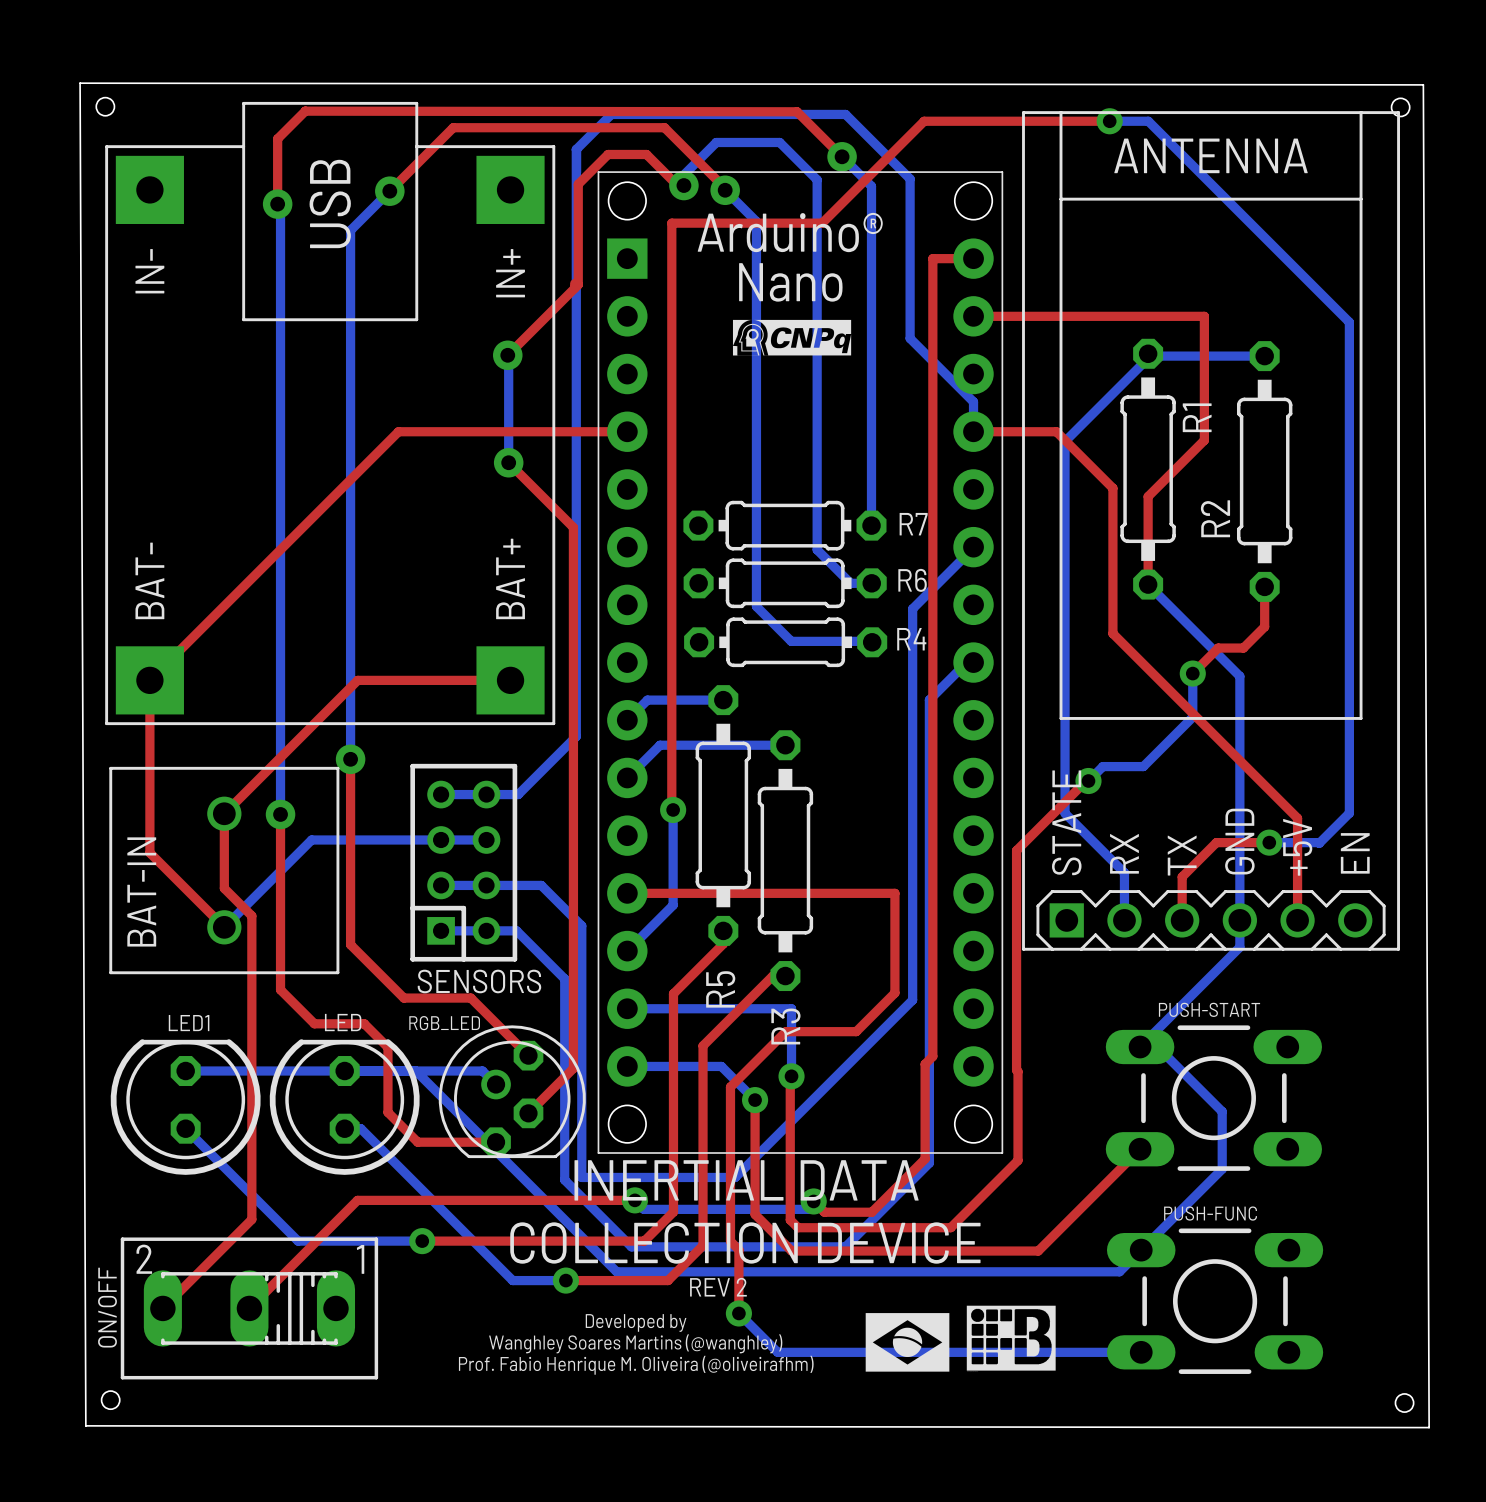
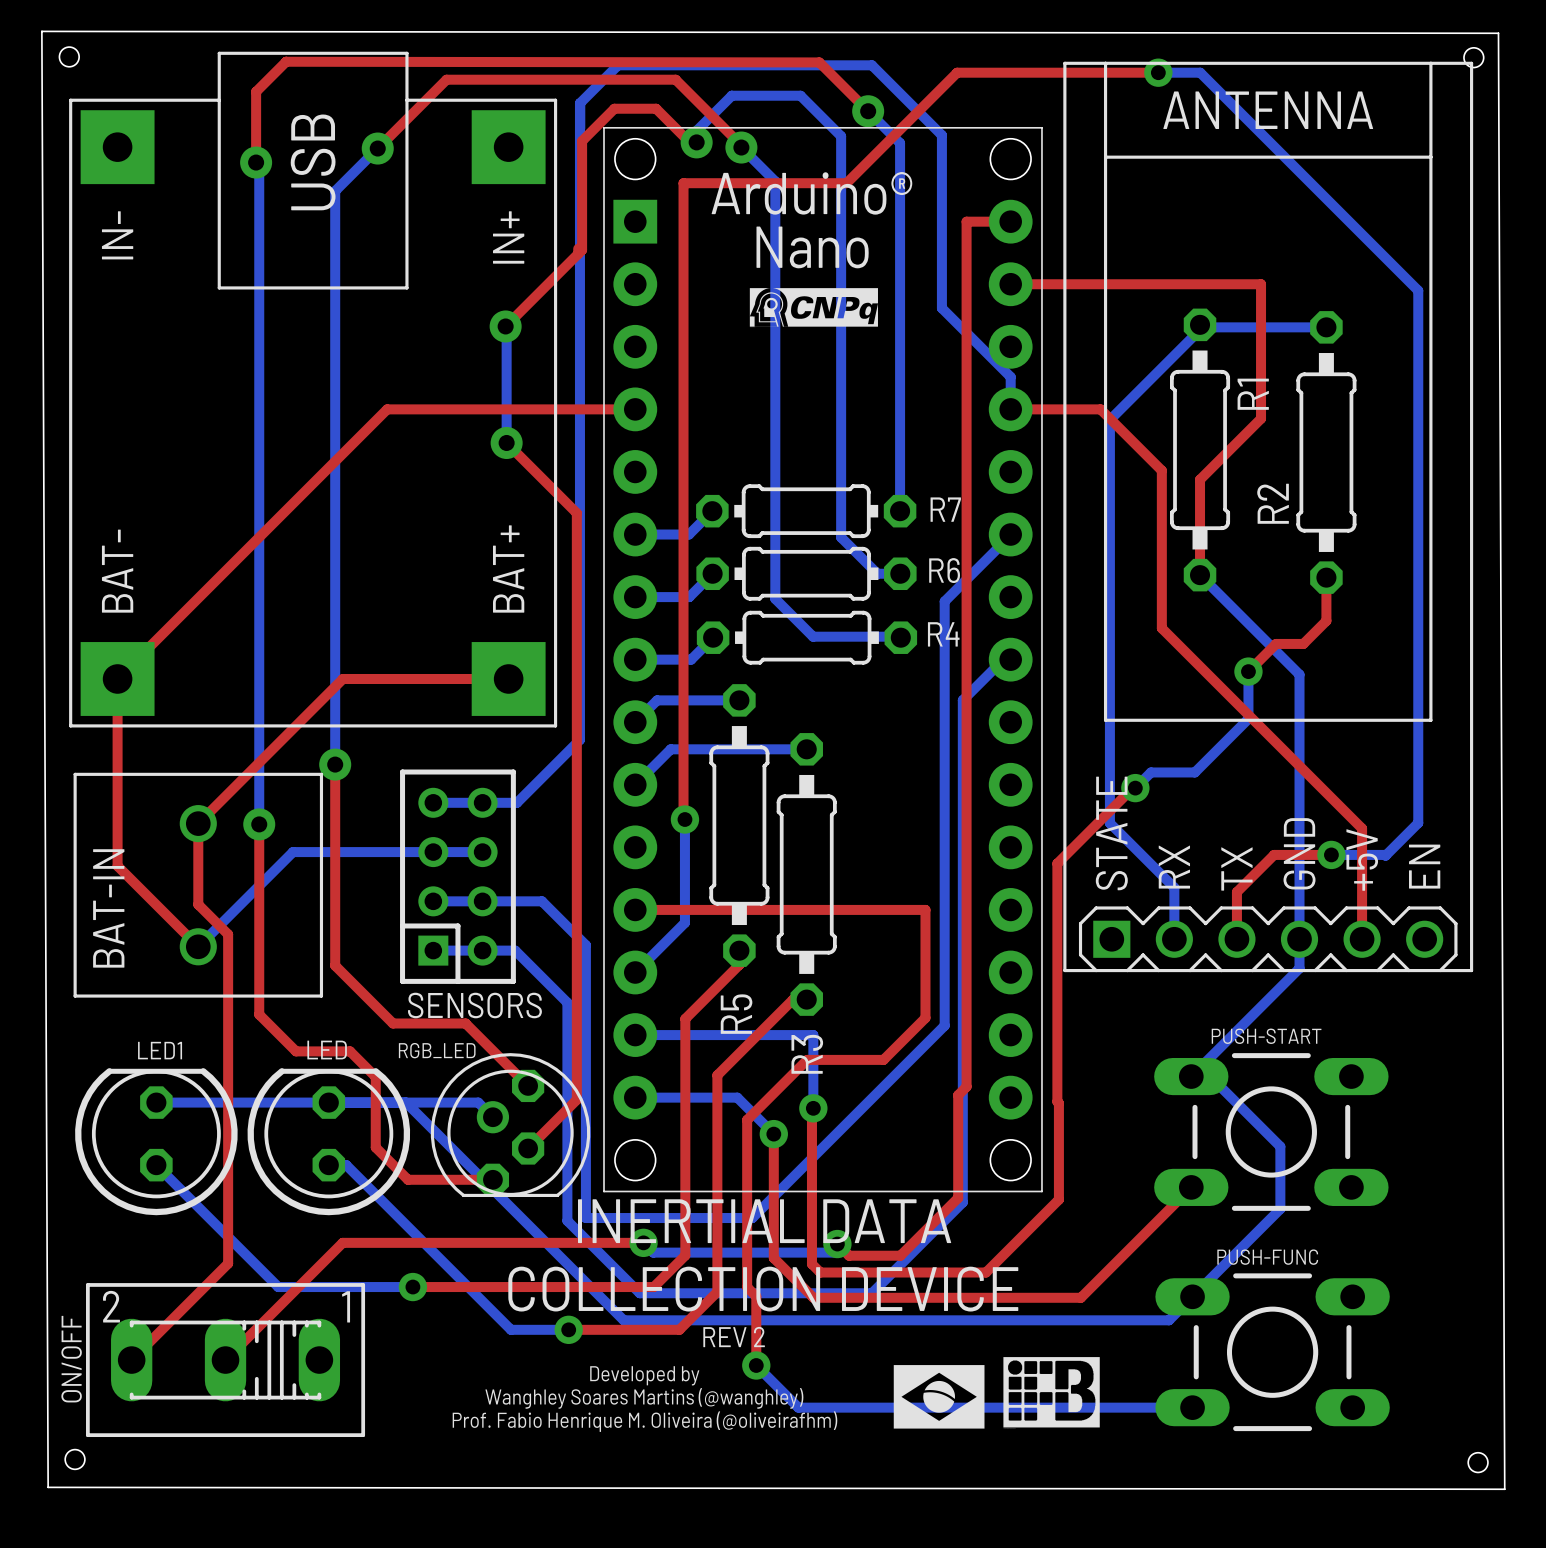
bottom track: none -> (712, 511) (689, 534) (635, 534)
bottom track: none -> (712, 573) (689, 597) (635, 597)
bottom track: none -> (713, 637) (691, 659) (635, 659)

